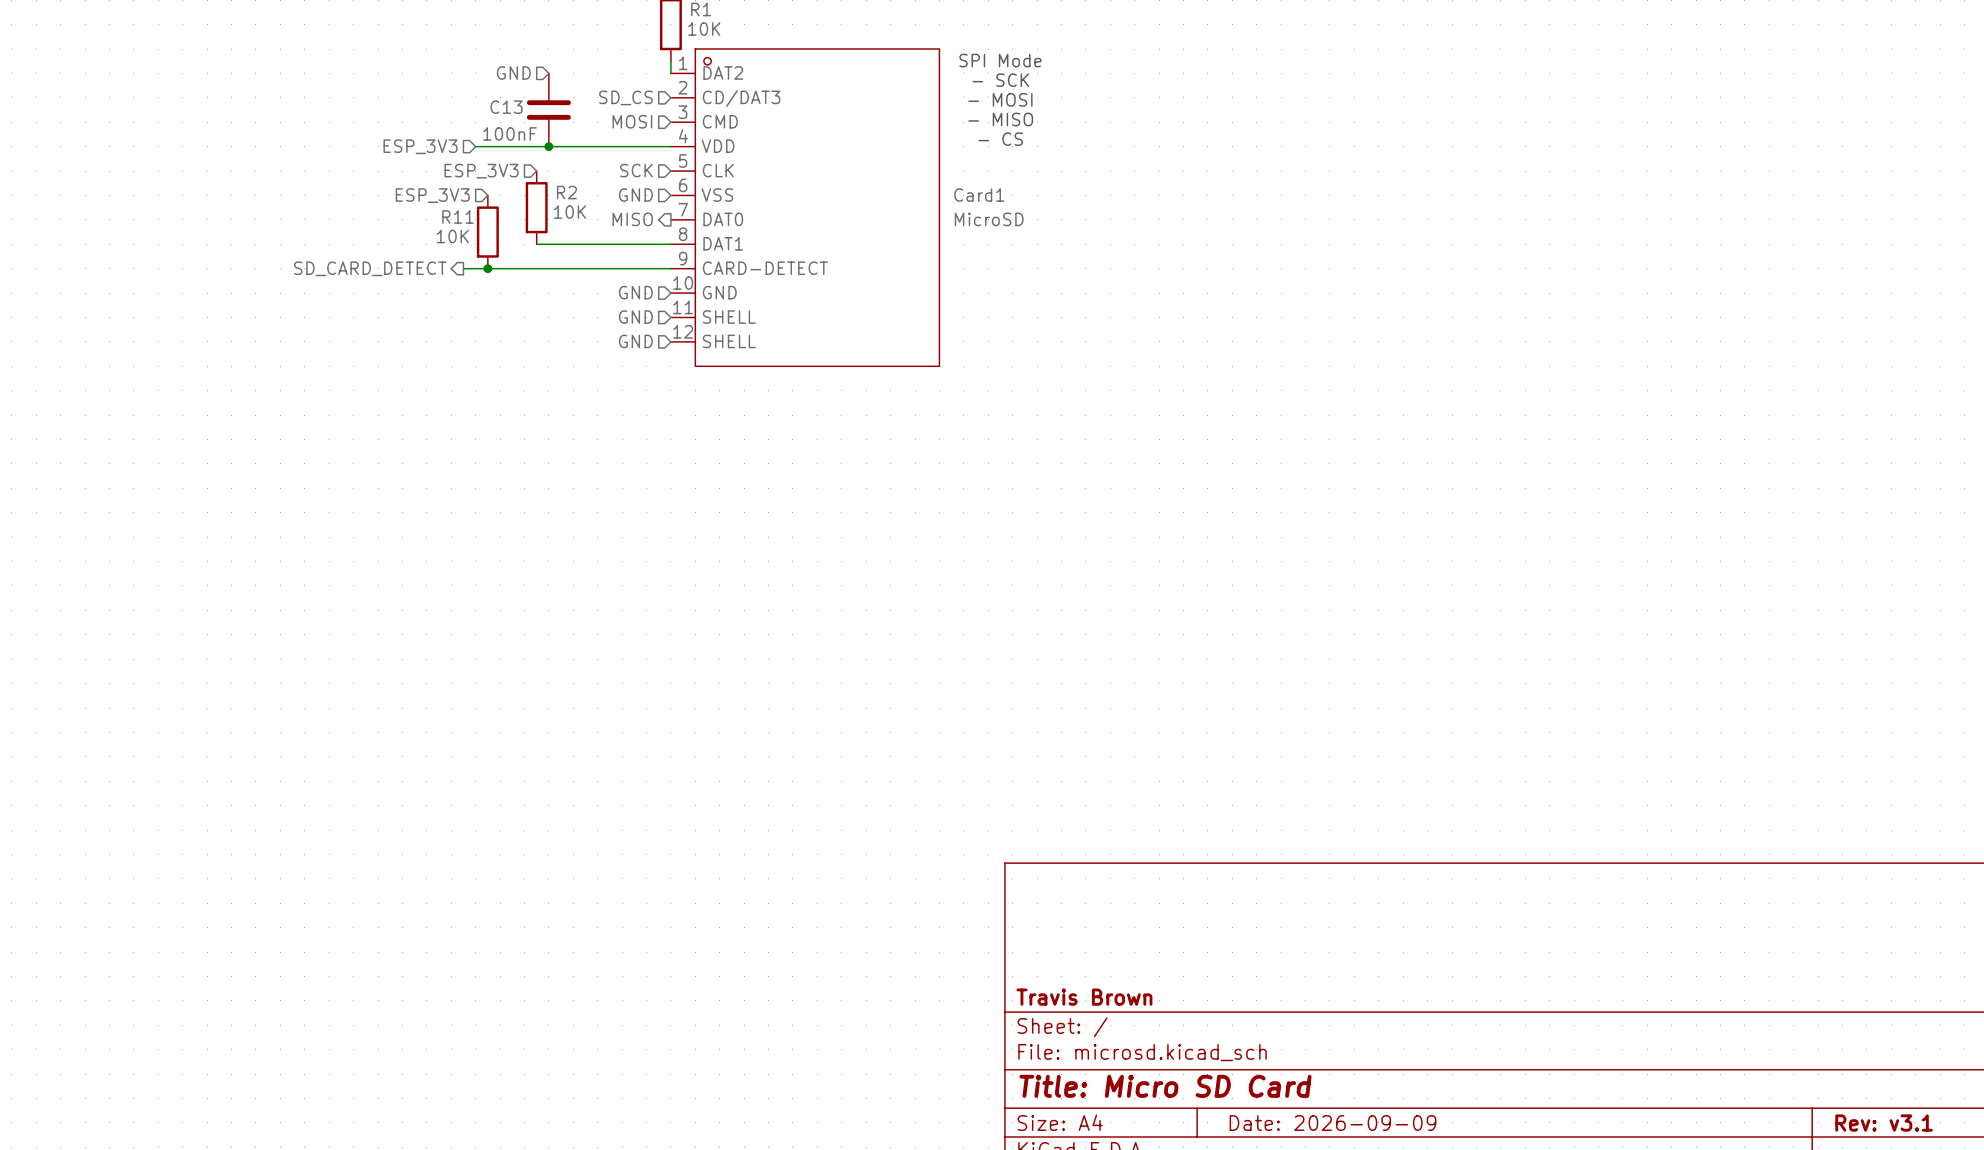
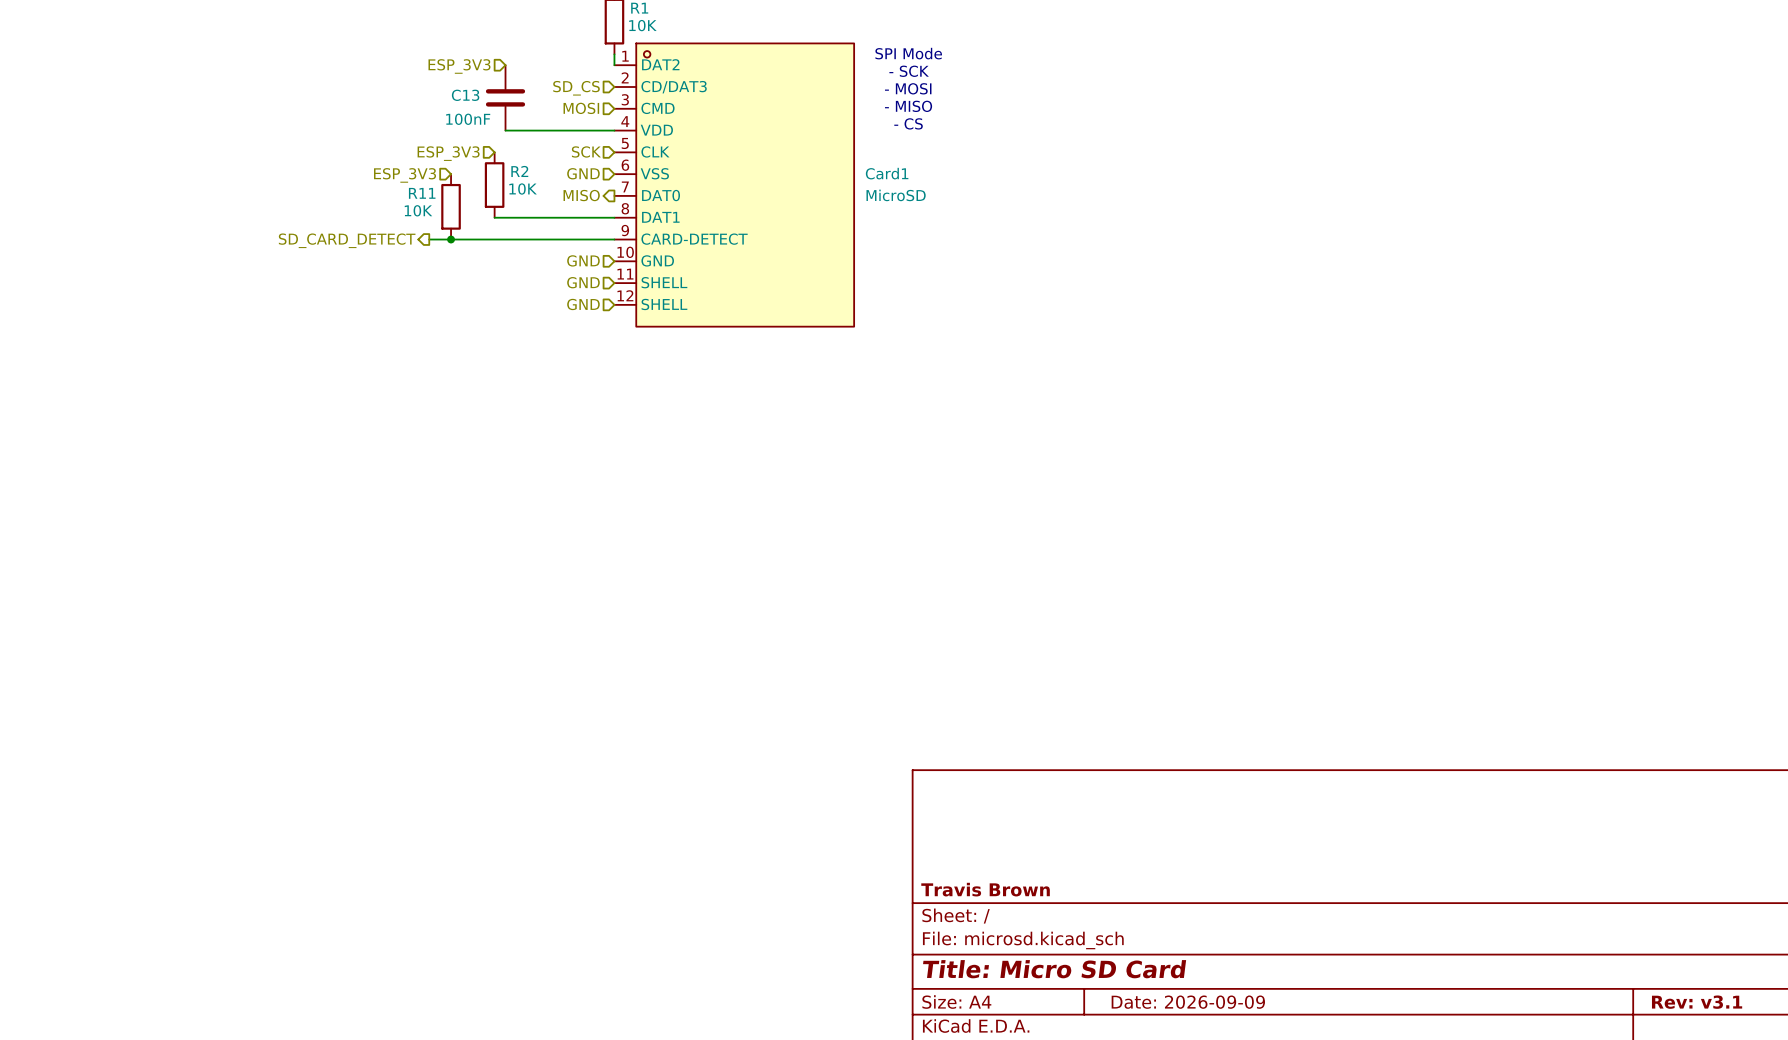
hierarchical label: GND (513, 72) -> ESP_3V3 (459, 66)
hierarchical label: ESP_3V3 (420, 146) -> none
wire: (475, 146) (548, 146) -> none
junction: (548, 146) -> none

